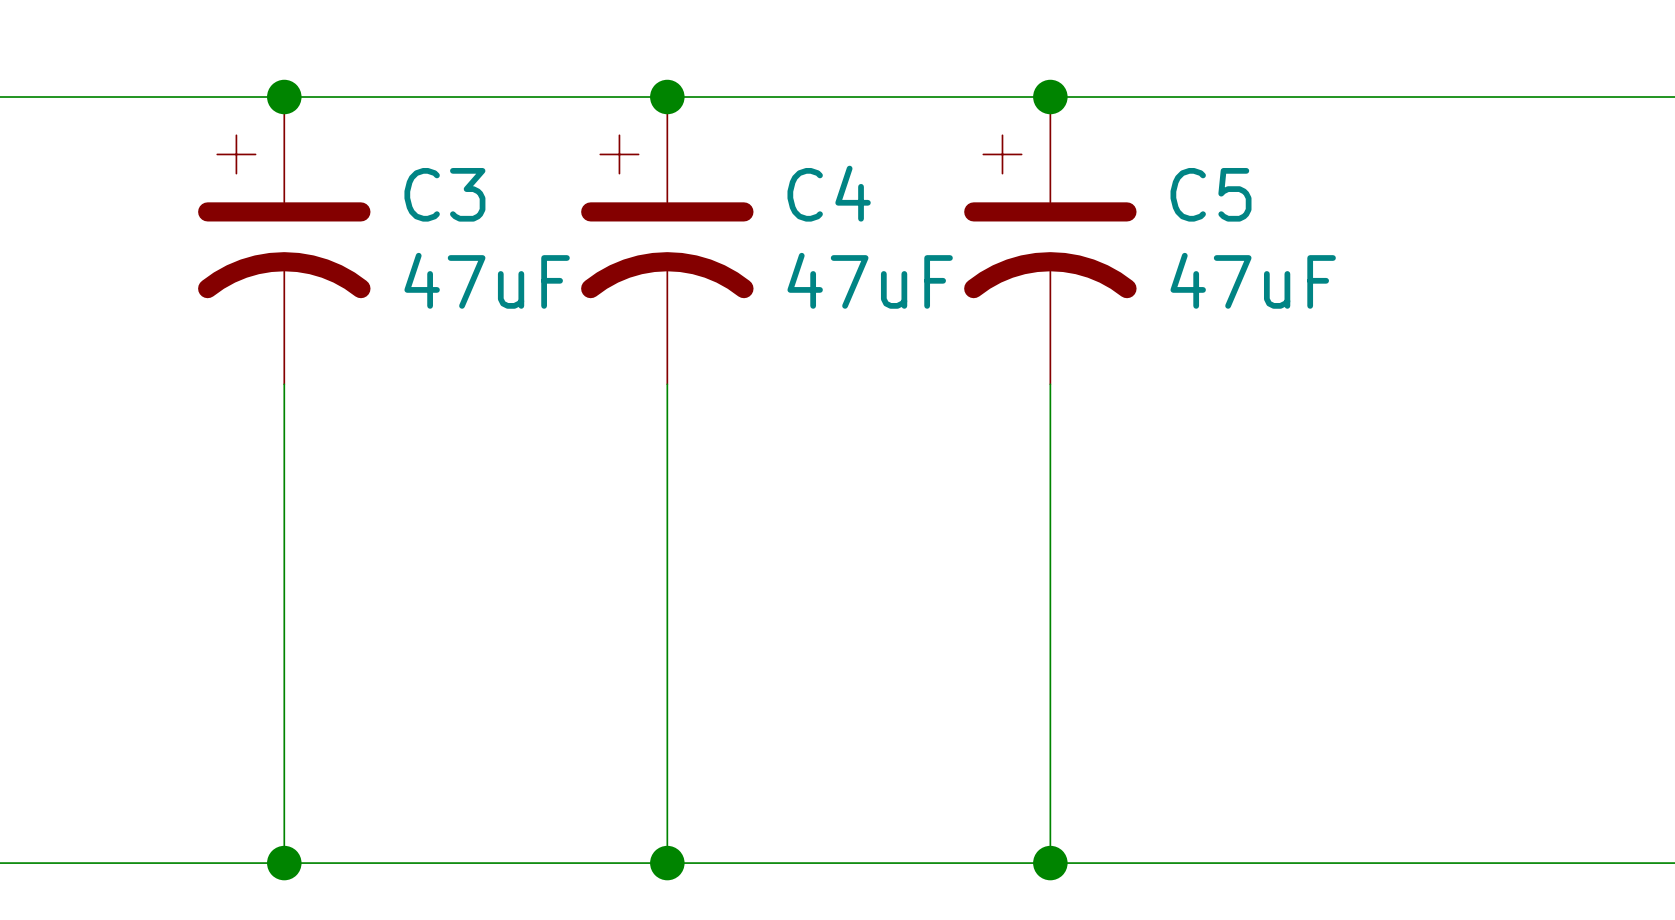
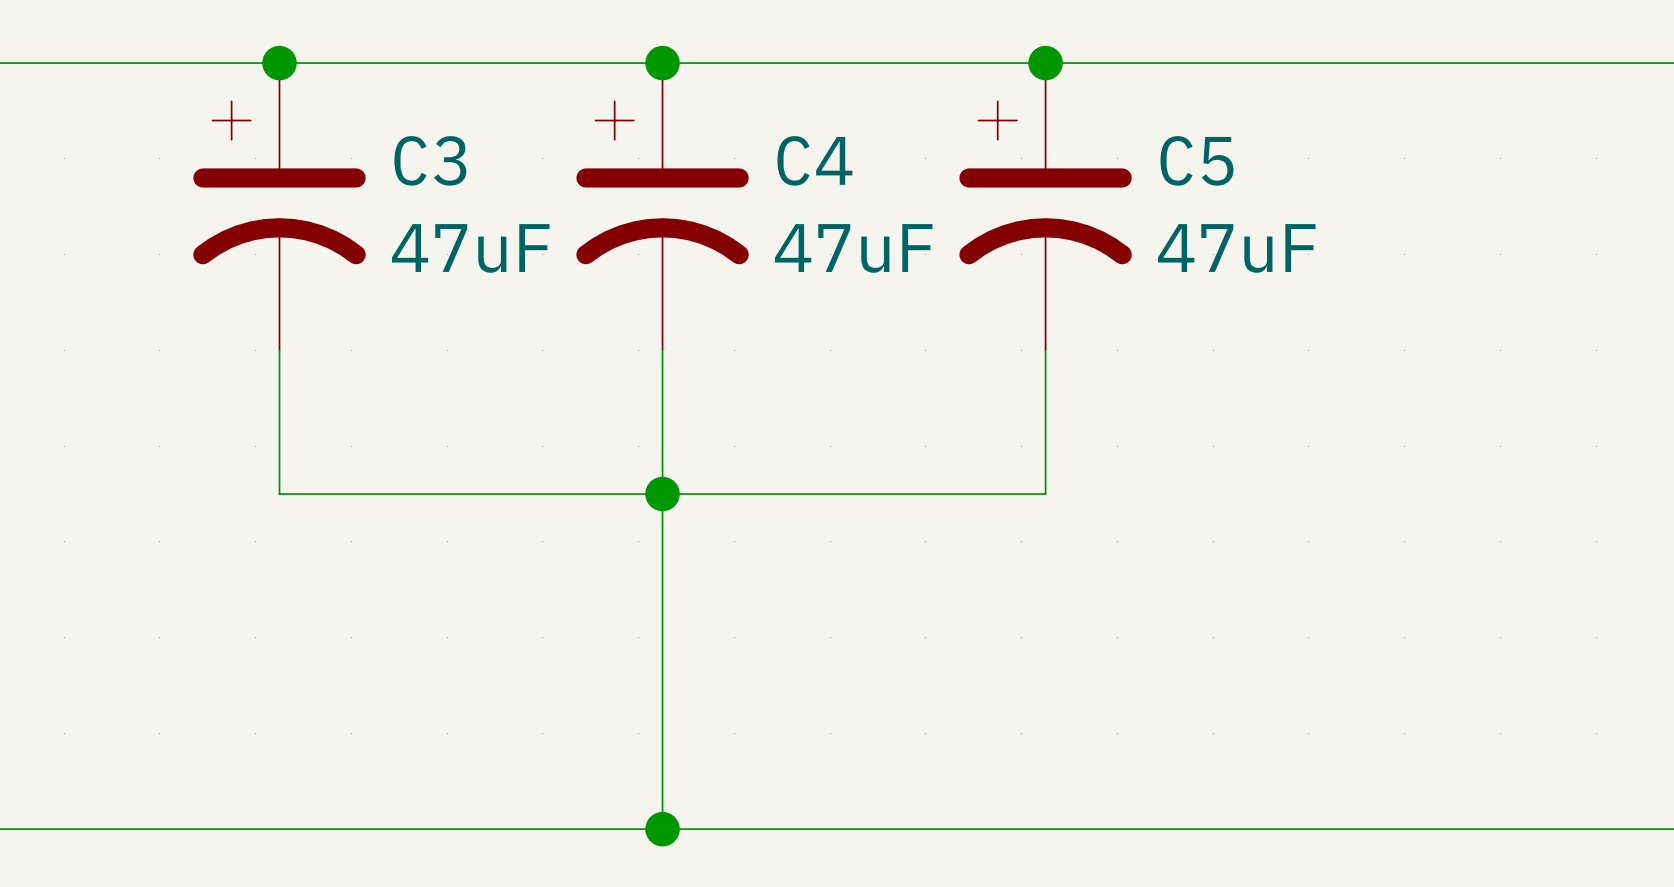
wire: (284, 527) (284, 863) -> (279, 493) (1045, 493)
junction: none -> (662, 493)
wire: (1050, 527) (1050, 863) -> none
junction: (284, 863) -> none
junction: (1050, 863) -> none

